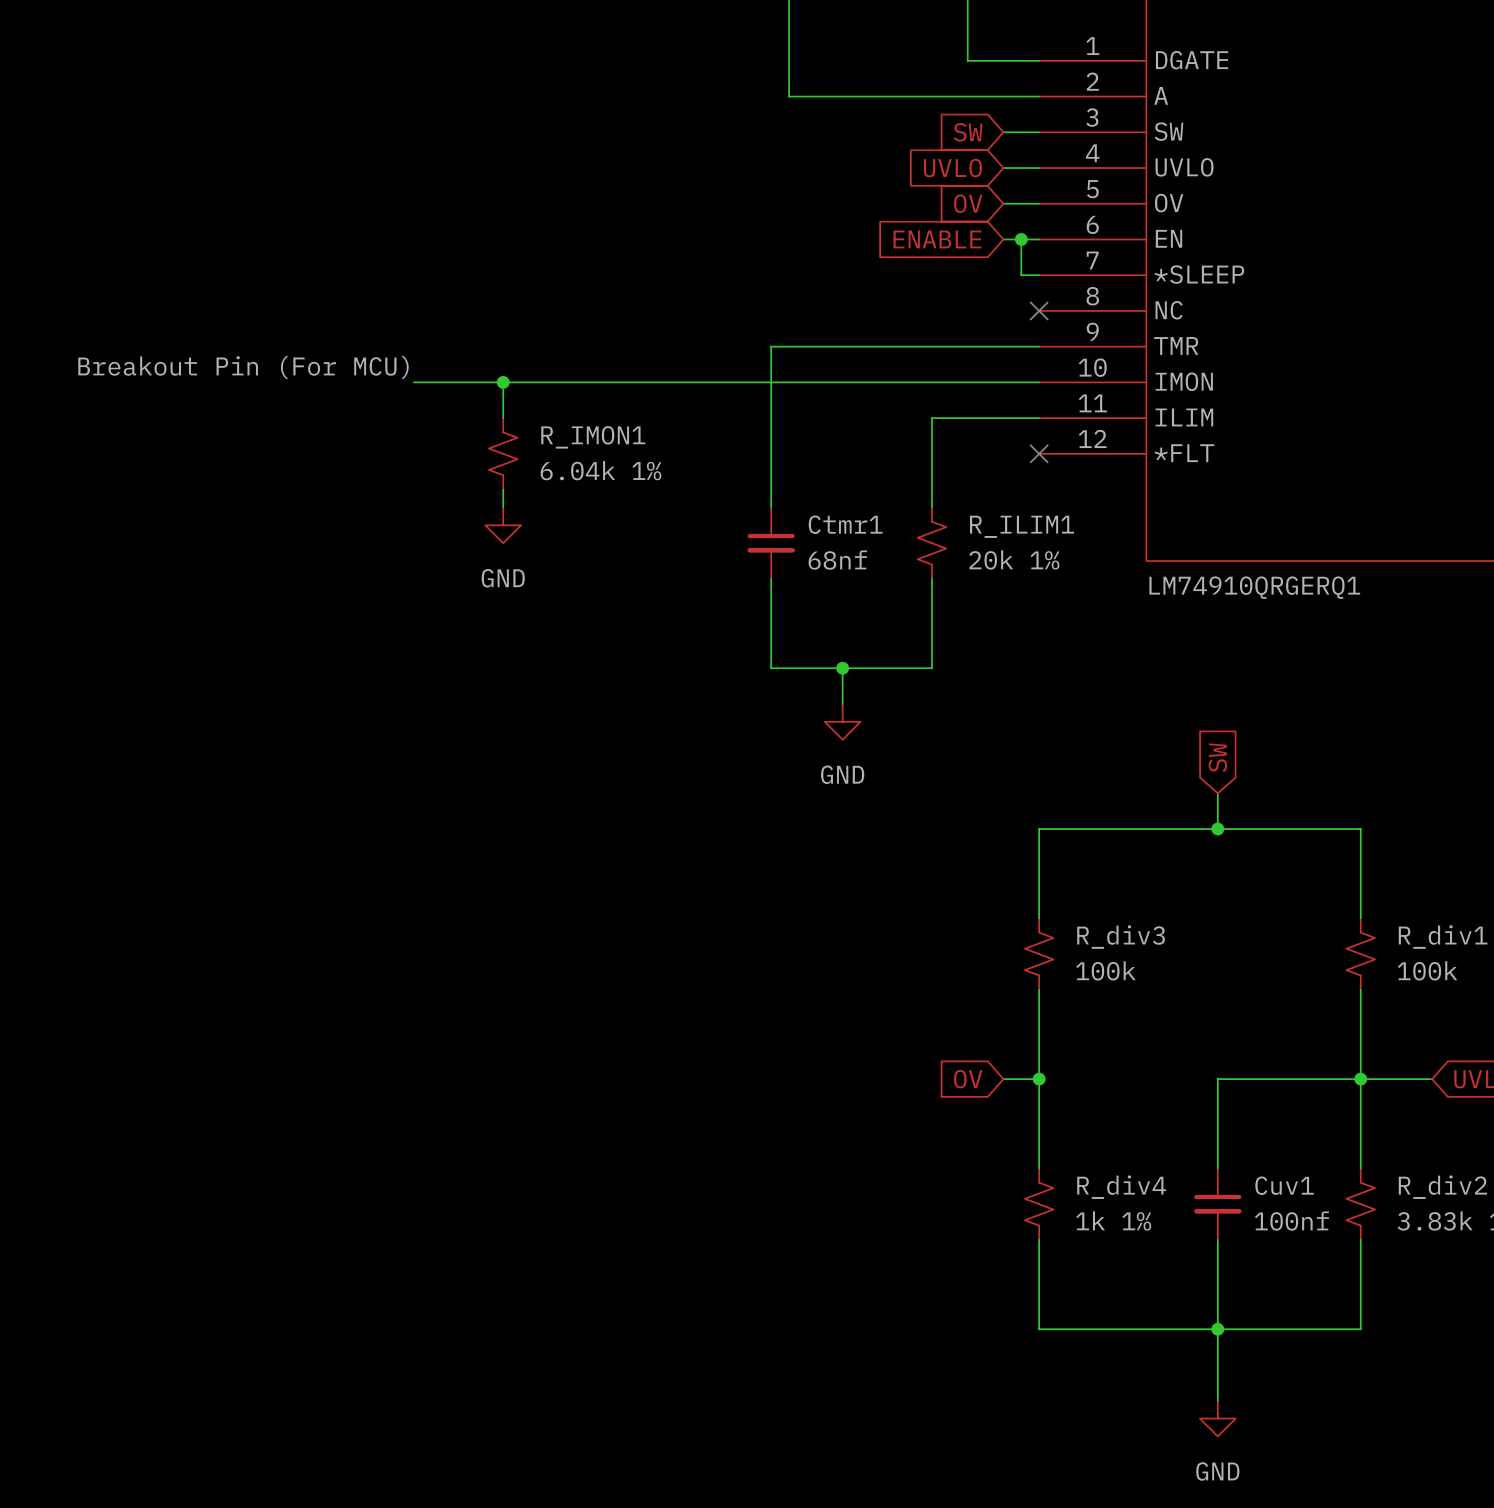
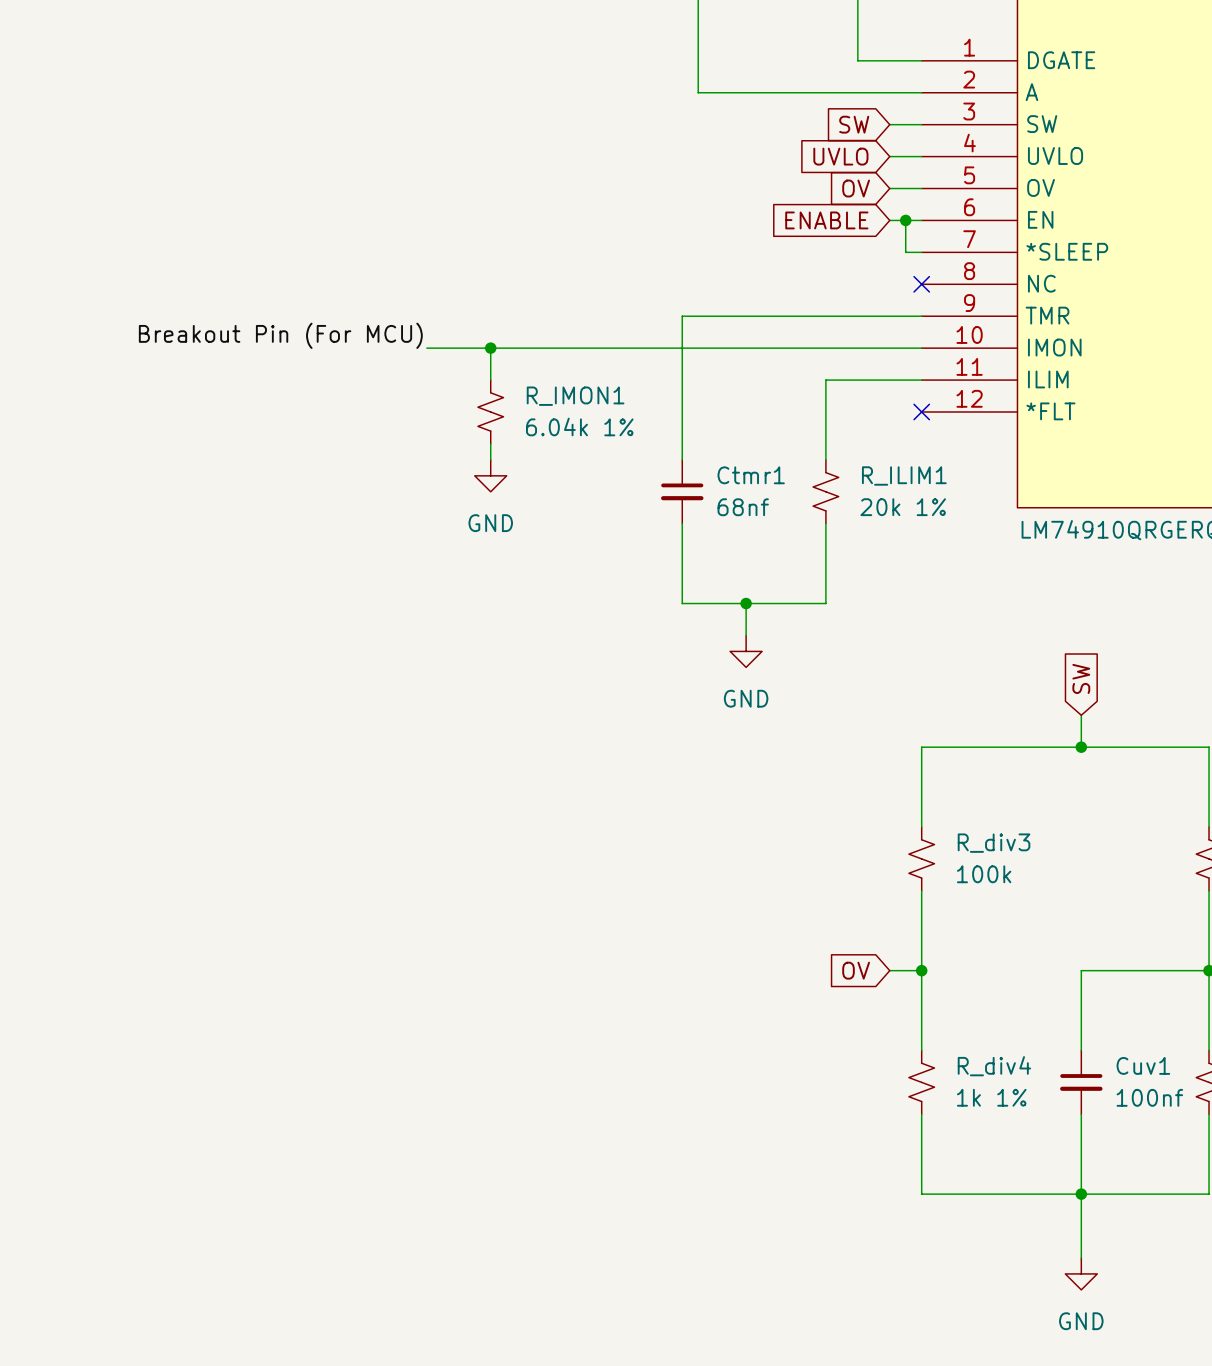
label position: Breakout Pin (For MCU) (243, 367) -> Breakout Pin (For MCU) (280, 335)
wire: (413, 382) (485, 382) -> none
wire: (503, 382) (503, 418) -> (490, 348) (490, 380)
junction position: (503, 382) -> (490, 348)
R_IMON1 position: (503, 453) -> (490, 411)
wire: (503, 489) (503, 507) -> (490, 443) (490, 459)
power symbol position: GND (503, 525) -> GND (490, 475)

